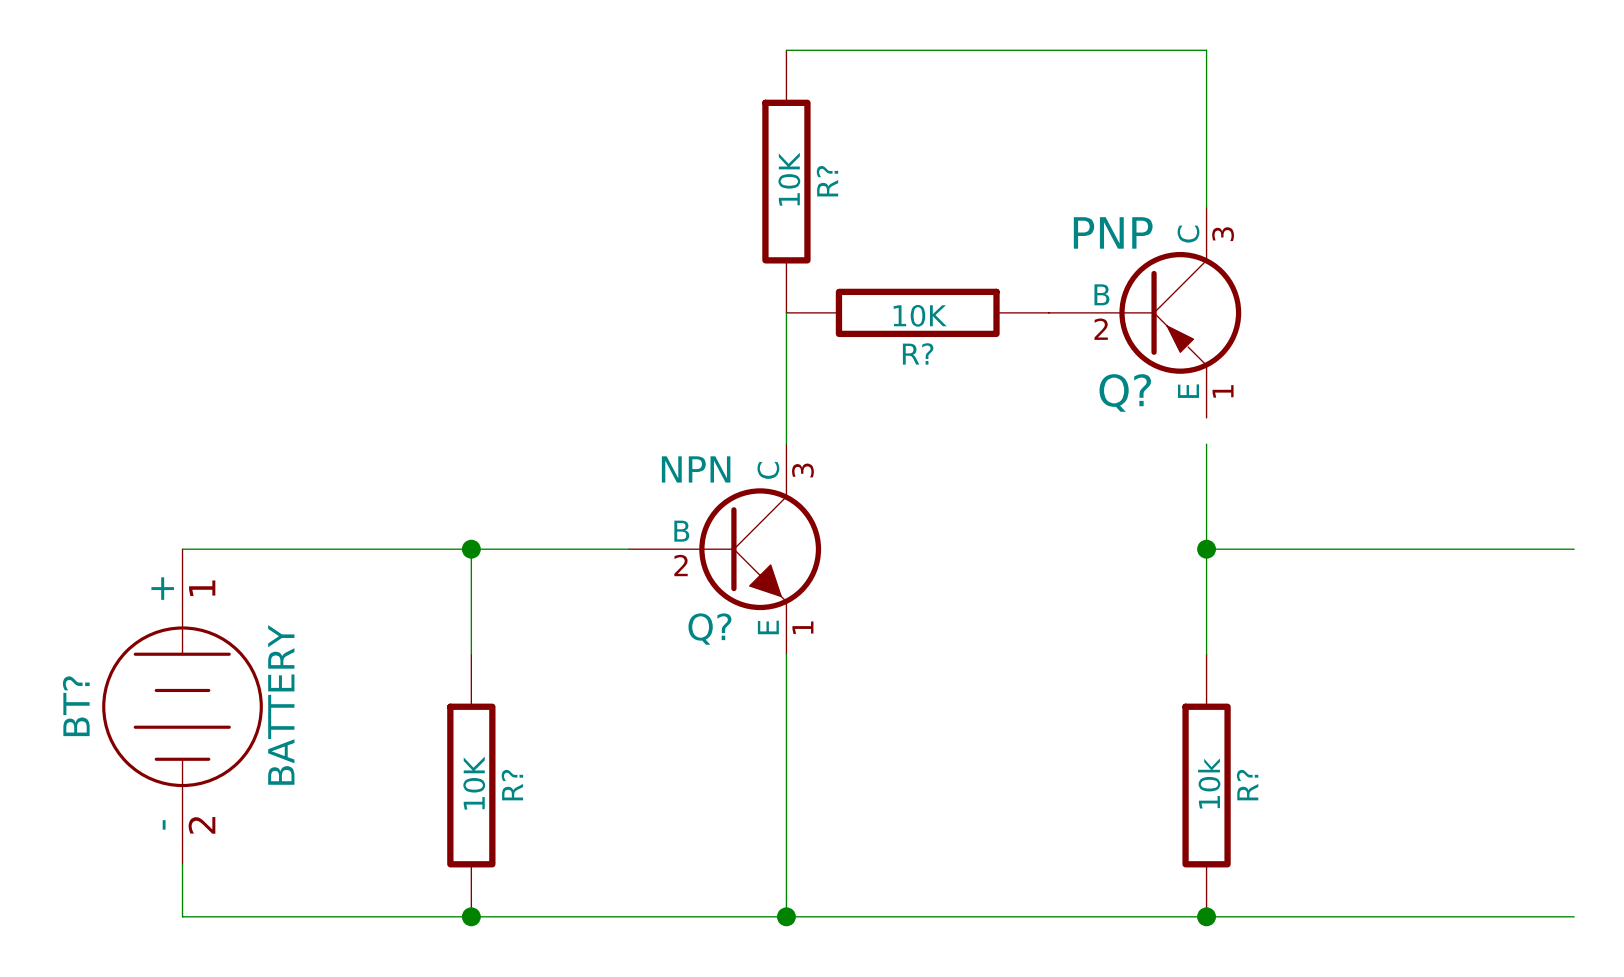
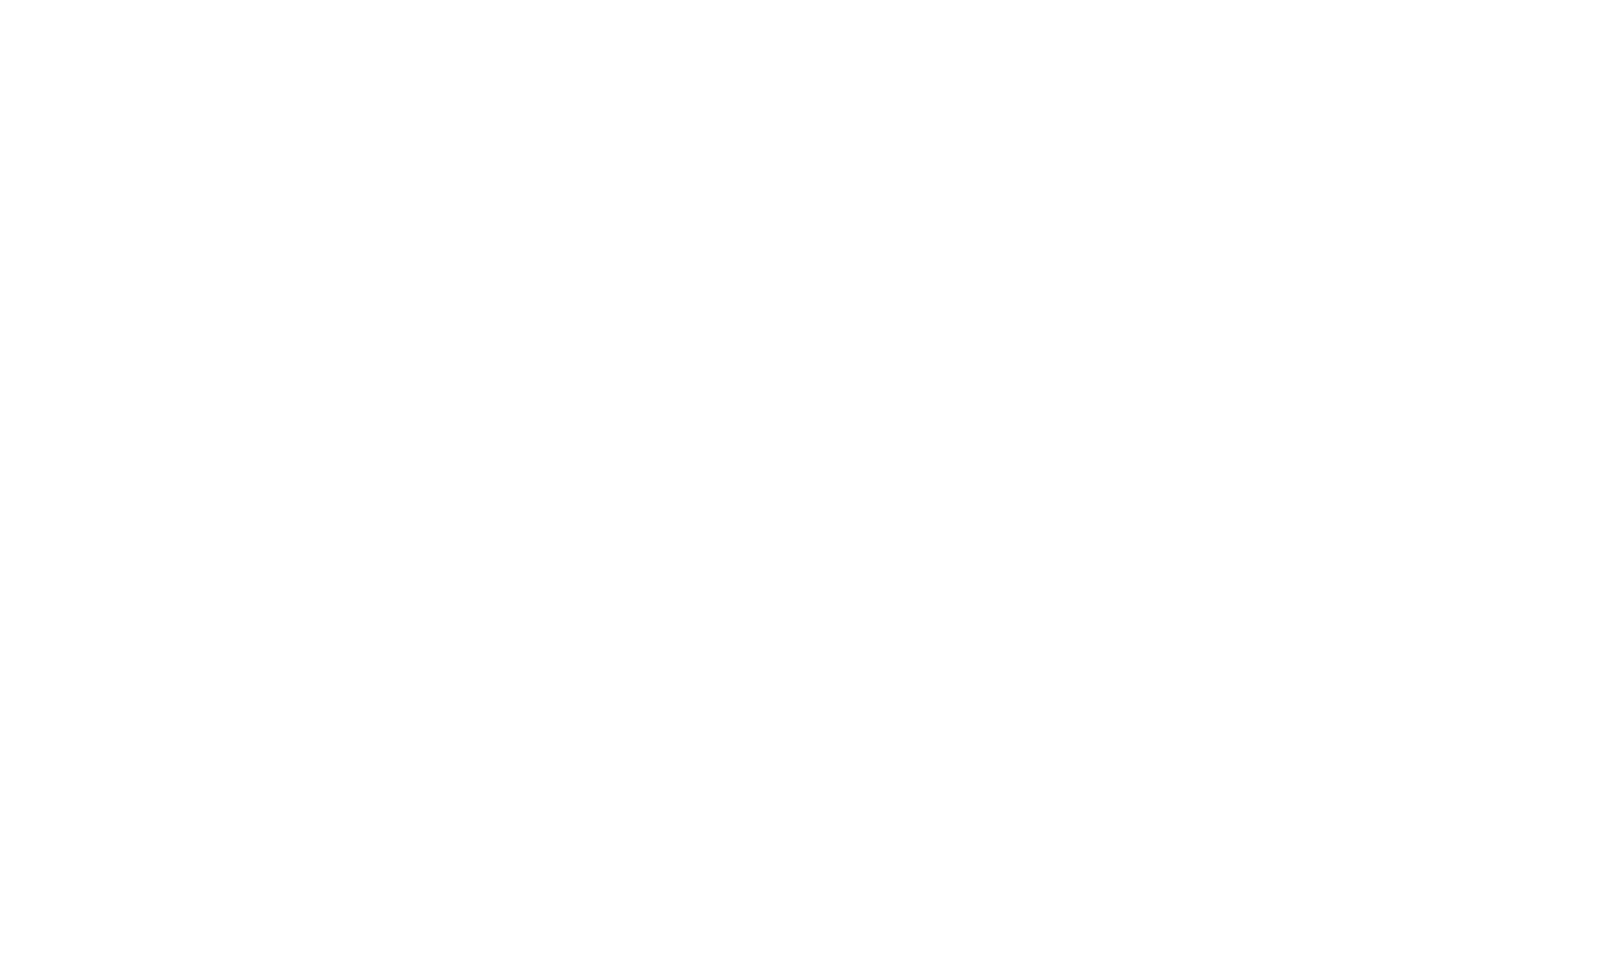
wire: (786, 50) (1206, 50) (1206, 207) -> none
R?: 10K (786, 181) -> none
wire: (786, 312) (786, 444) -> none
R?: 10K (917, 312) -> none
Q?: PNP (1145, 312) -> none
wire: (1206, 444) (1206, 654) -> none
wire: (182, 549) (628, 549) -> none
wire: (471, 549) (471, 654) -> none
junction: (471, 549) -> none
Q?: NPN (725, 549) -> none
wire: (1206, 549) (1574, 549) -> none
junction: (1206, 549) -> none
wire: (786, 654) (786, 916) -> none
BT?: BATTERY (182, 706) -> none
R?: 10K (471, 785) -> none
R?: 10k (1206, 785) -> none
wire: (182, 864) (182, 916) (1574, 916) -> none
junction: (471, 916) -> none
junction: (786, 916) -> none
junction: (1206, 916) -> none

